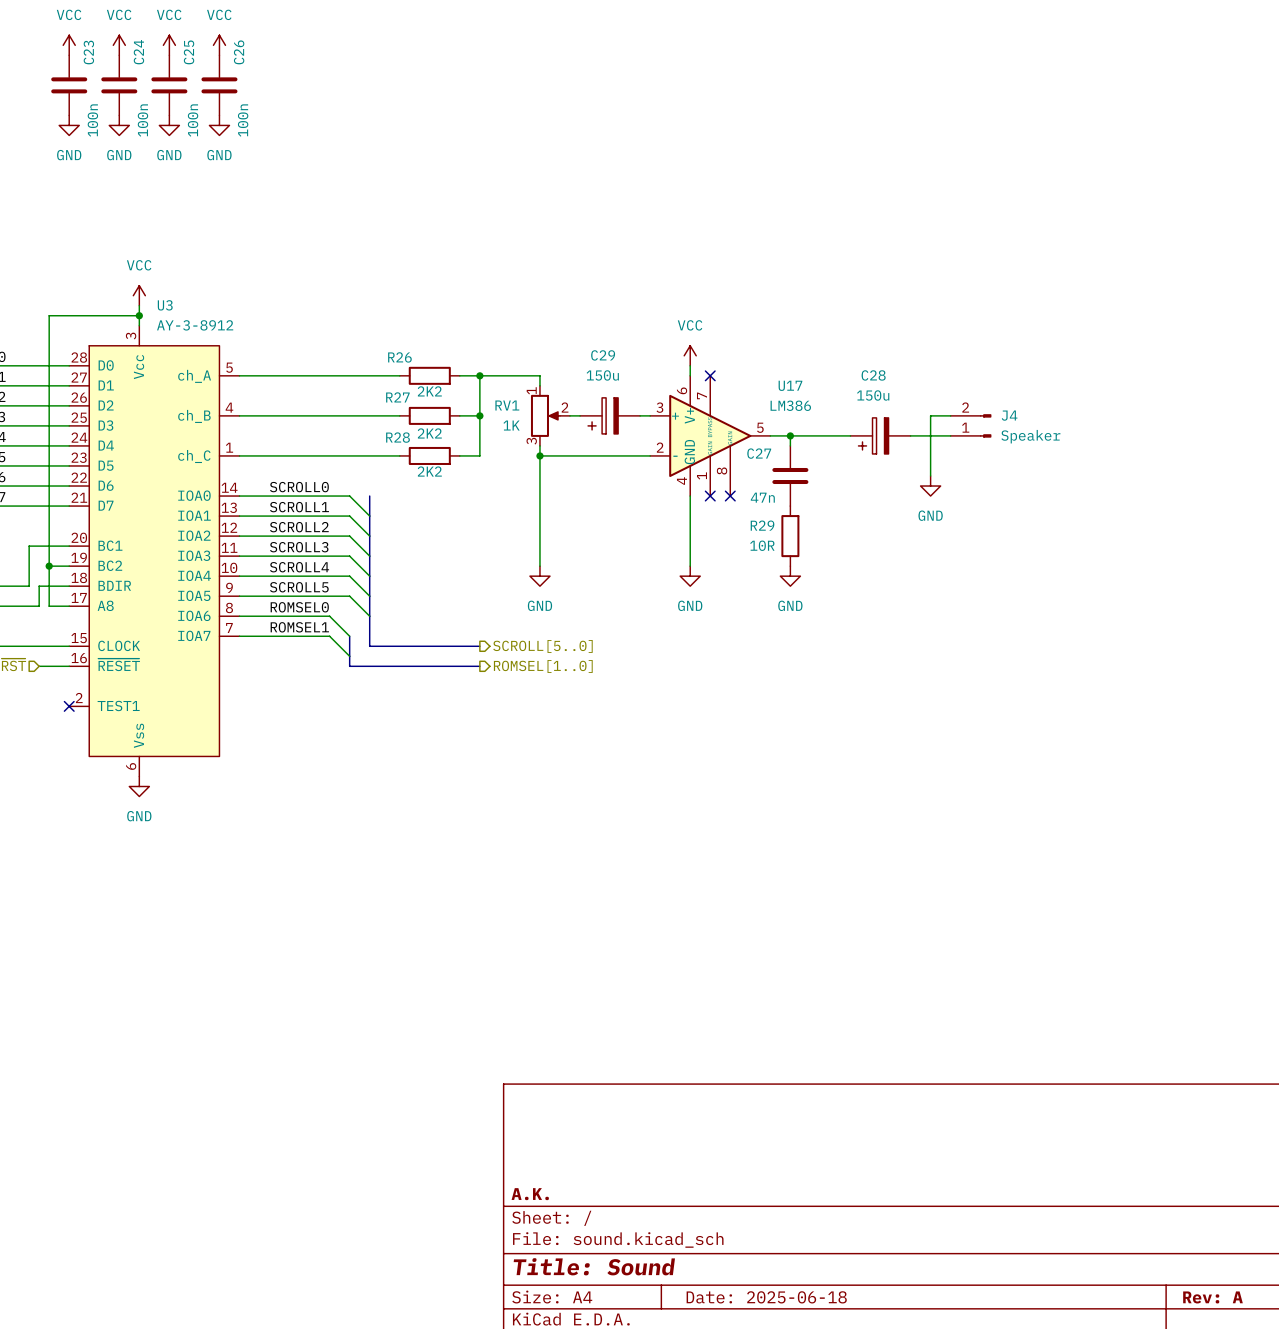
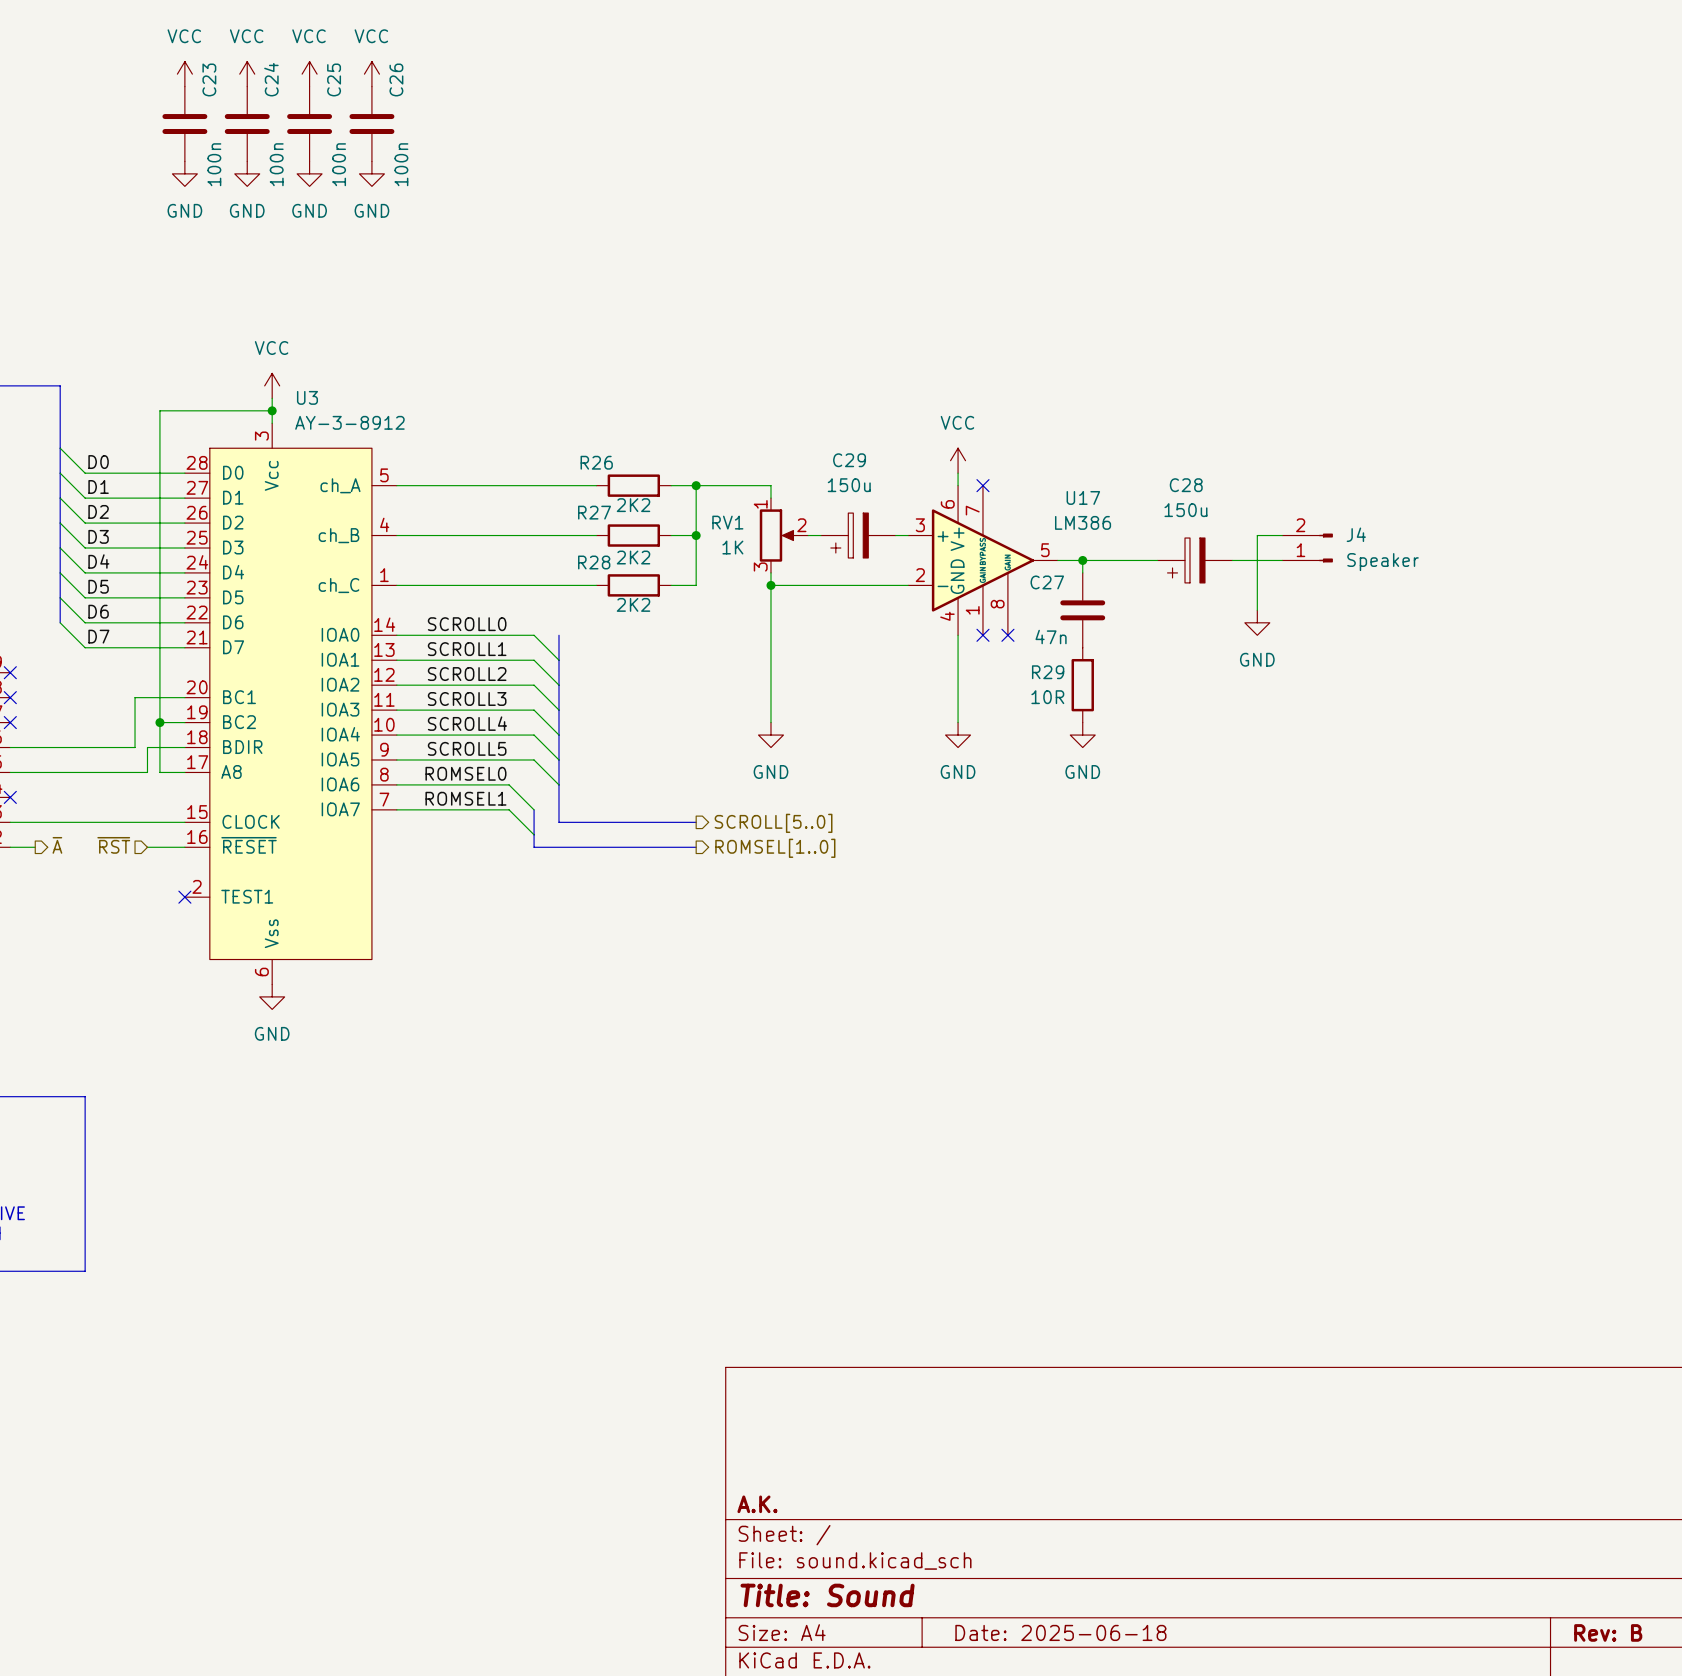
title block: Rev: A (1212, 1297) -> Rev: B (1608, 1632)

